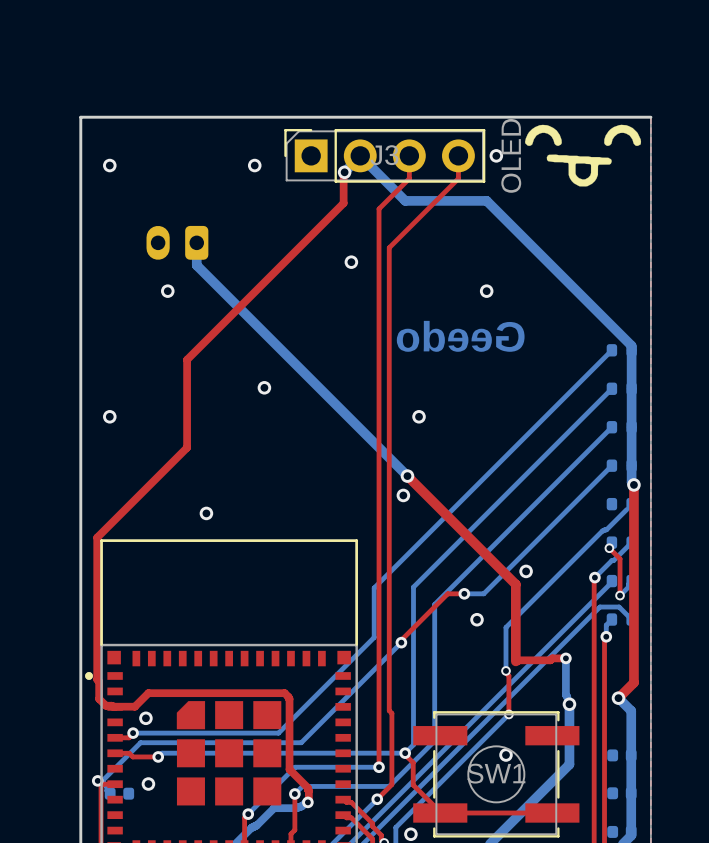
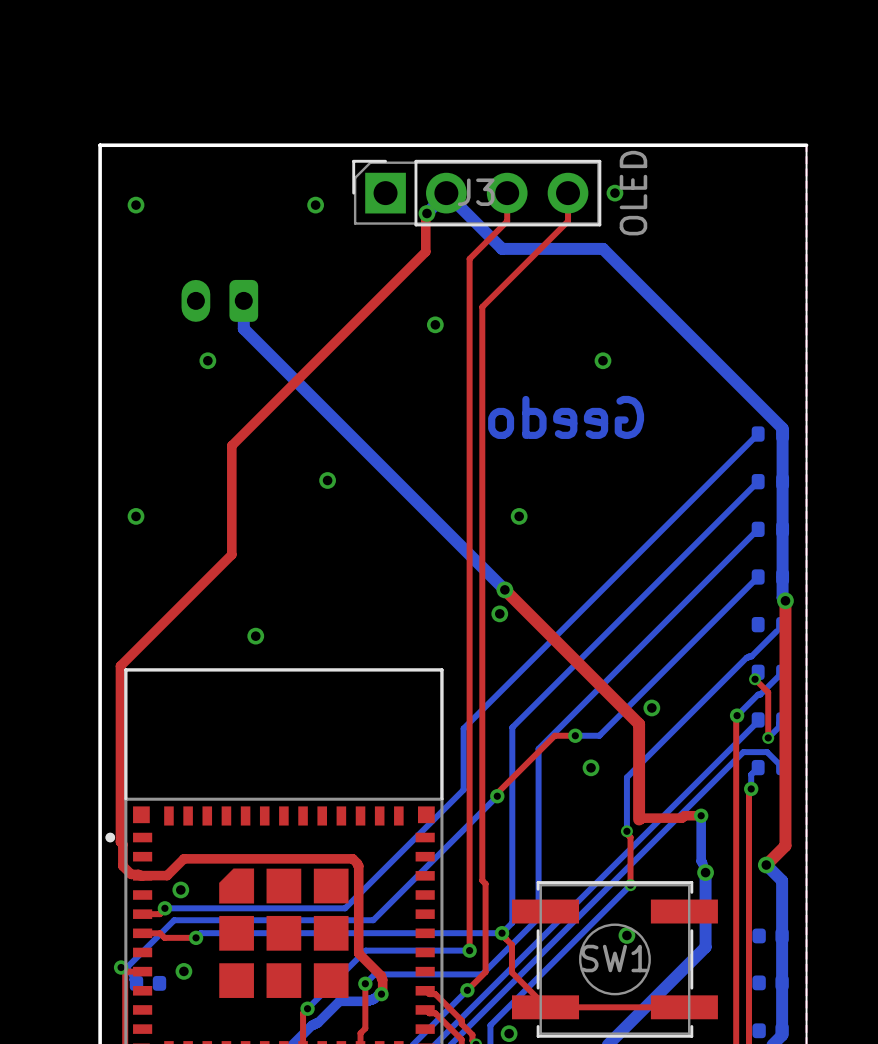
drawing: [525, 124, 642, 187] -> none

